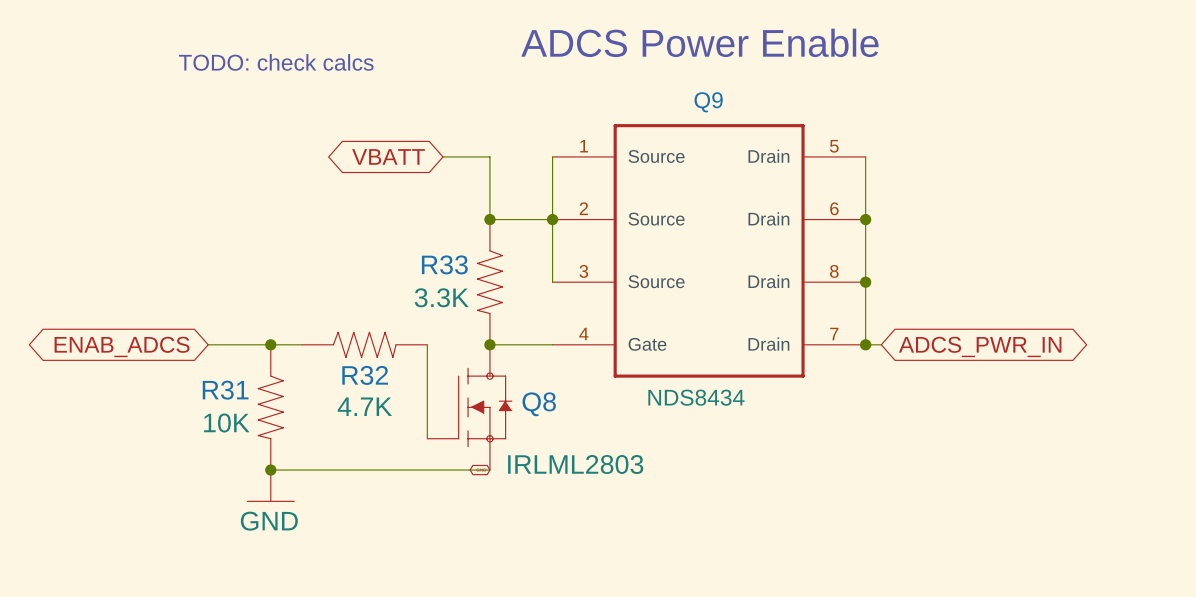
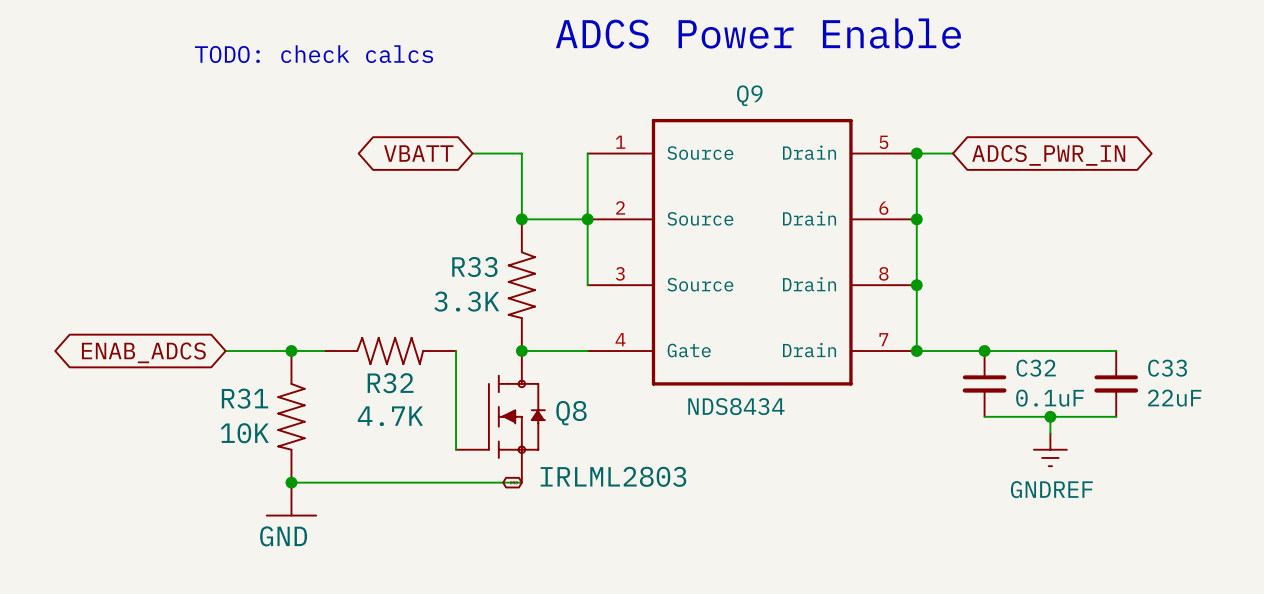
wire: none -> (916, 153) (952, 153)
junction: none -> (916, 153)
wire: none -> (933, 351) (1116, 351)
junction: none -> (984, 351)
global label position: ADCS_PWR_IN (980, 346) -> ADCS_PWR_IN (1048, 155)
C32: none -> 0.1uF (984, 383)
C33: none -> 22uF (1116, 383)
wire: none -> (984, 416) (1116, 416)
wire: none -> (1050, 416) (1050, 433)
junction: none -> (1050, 416)
power symbol: none -> GNDREF (1050, 449)

